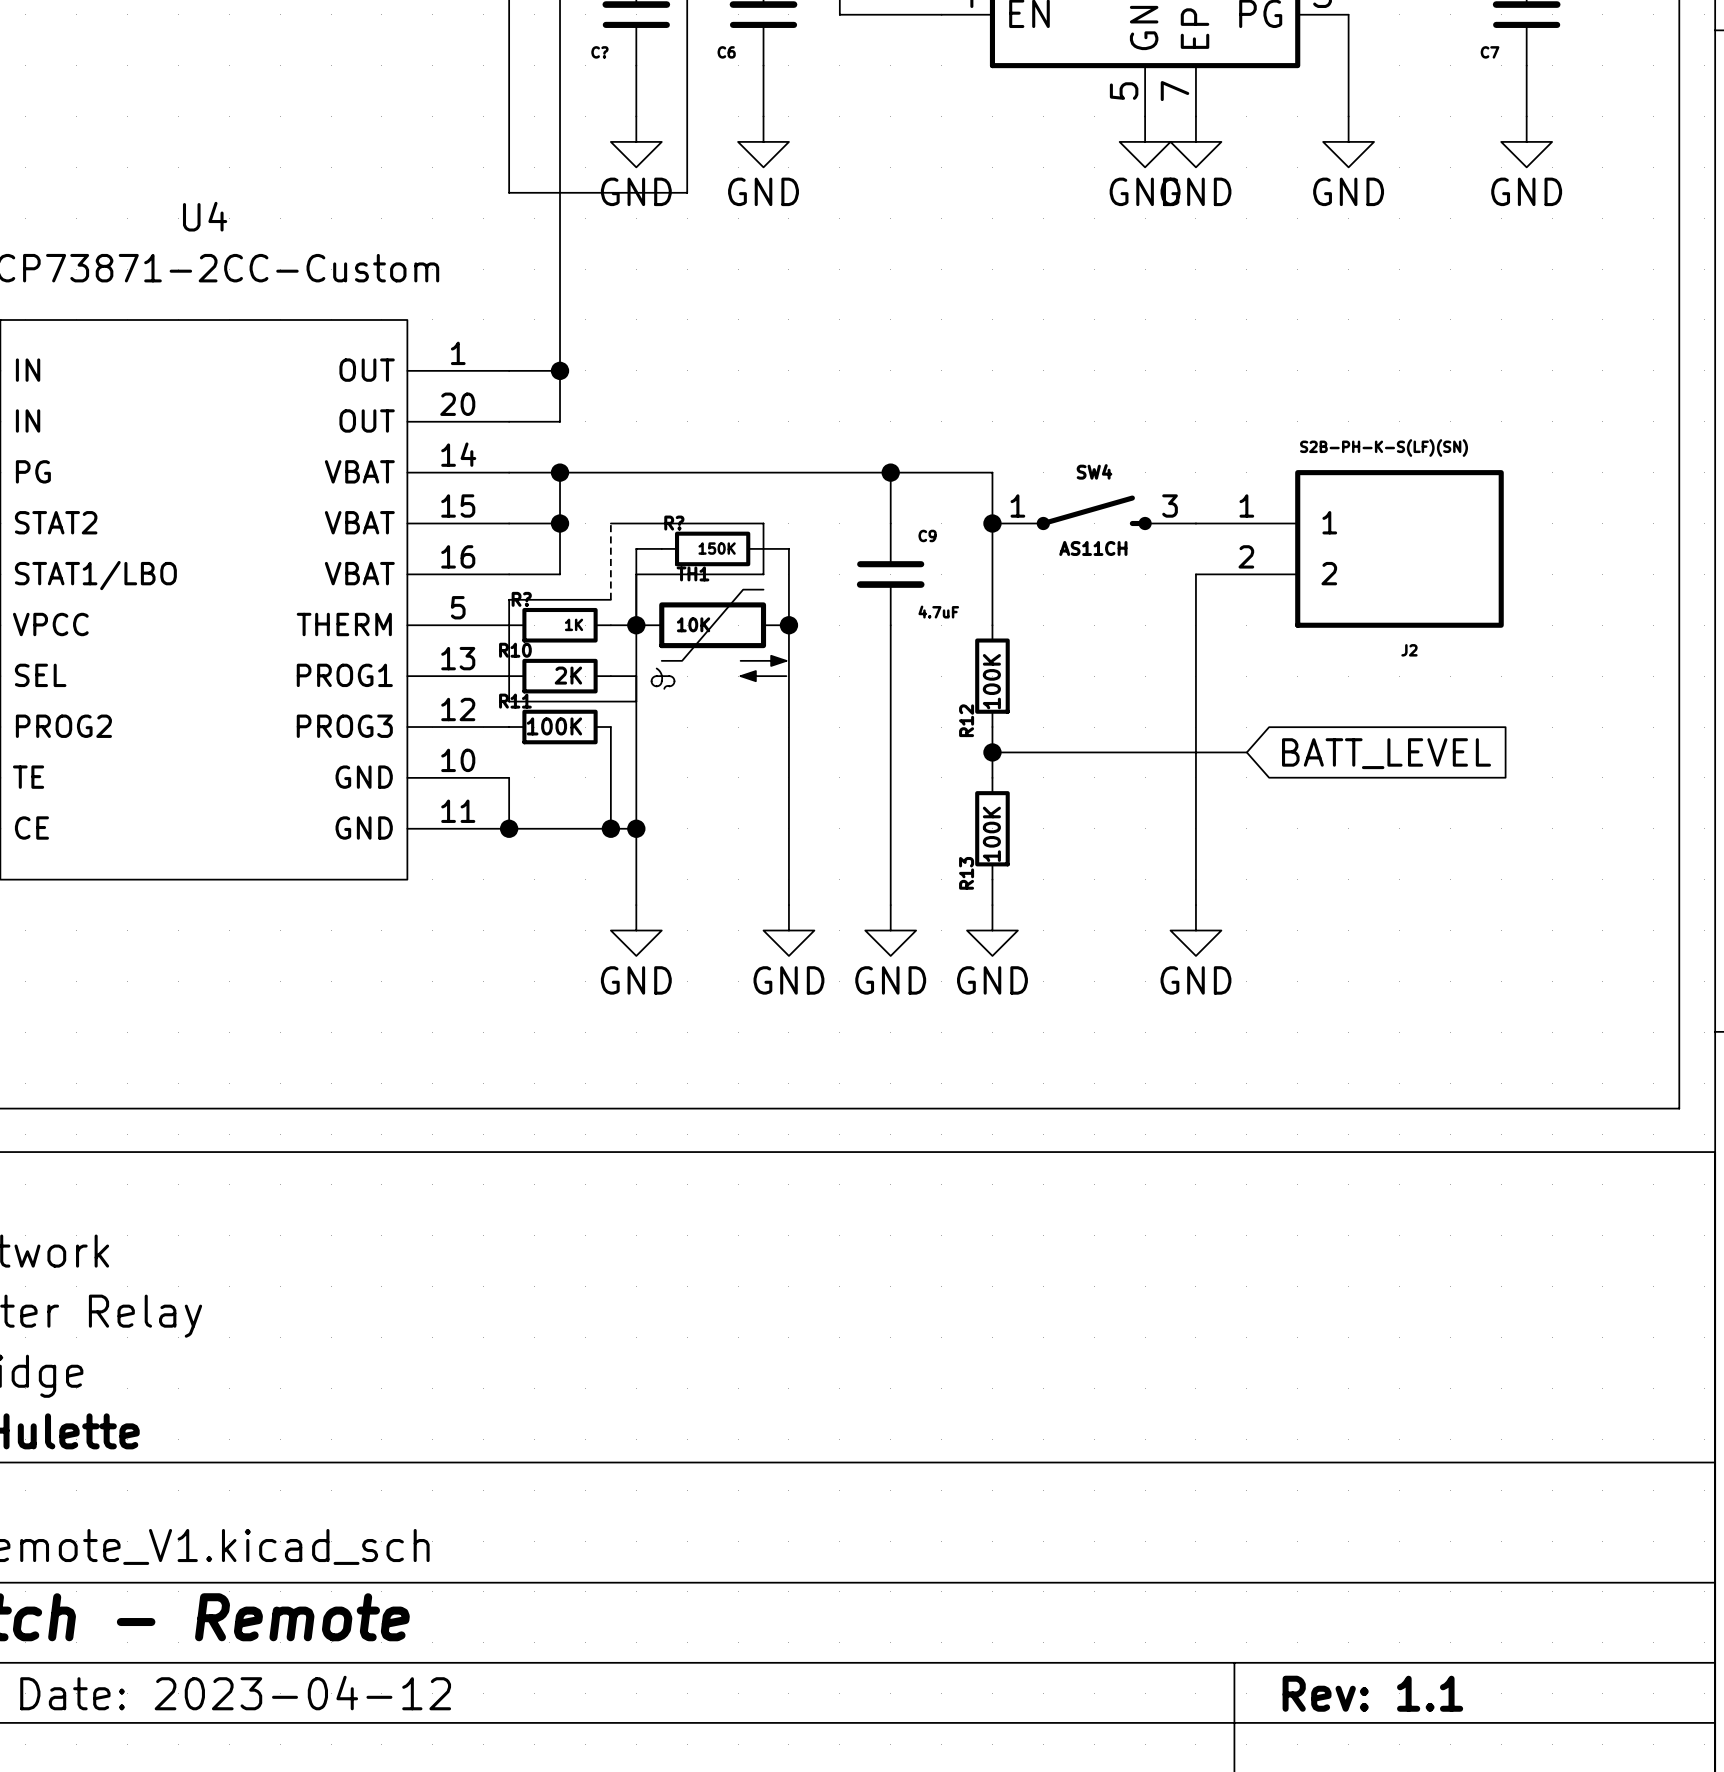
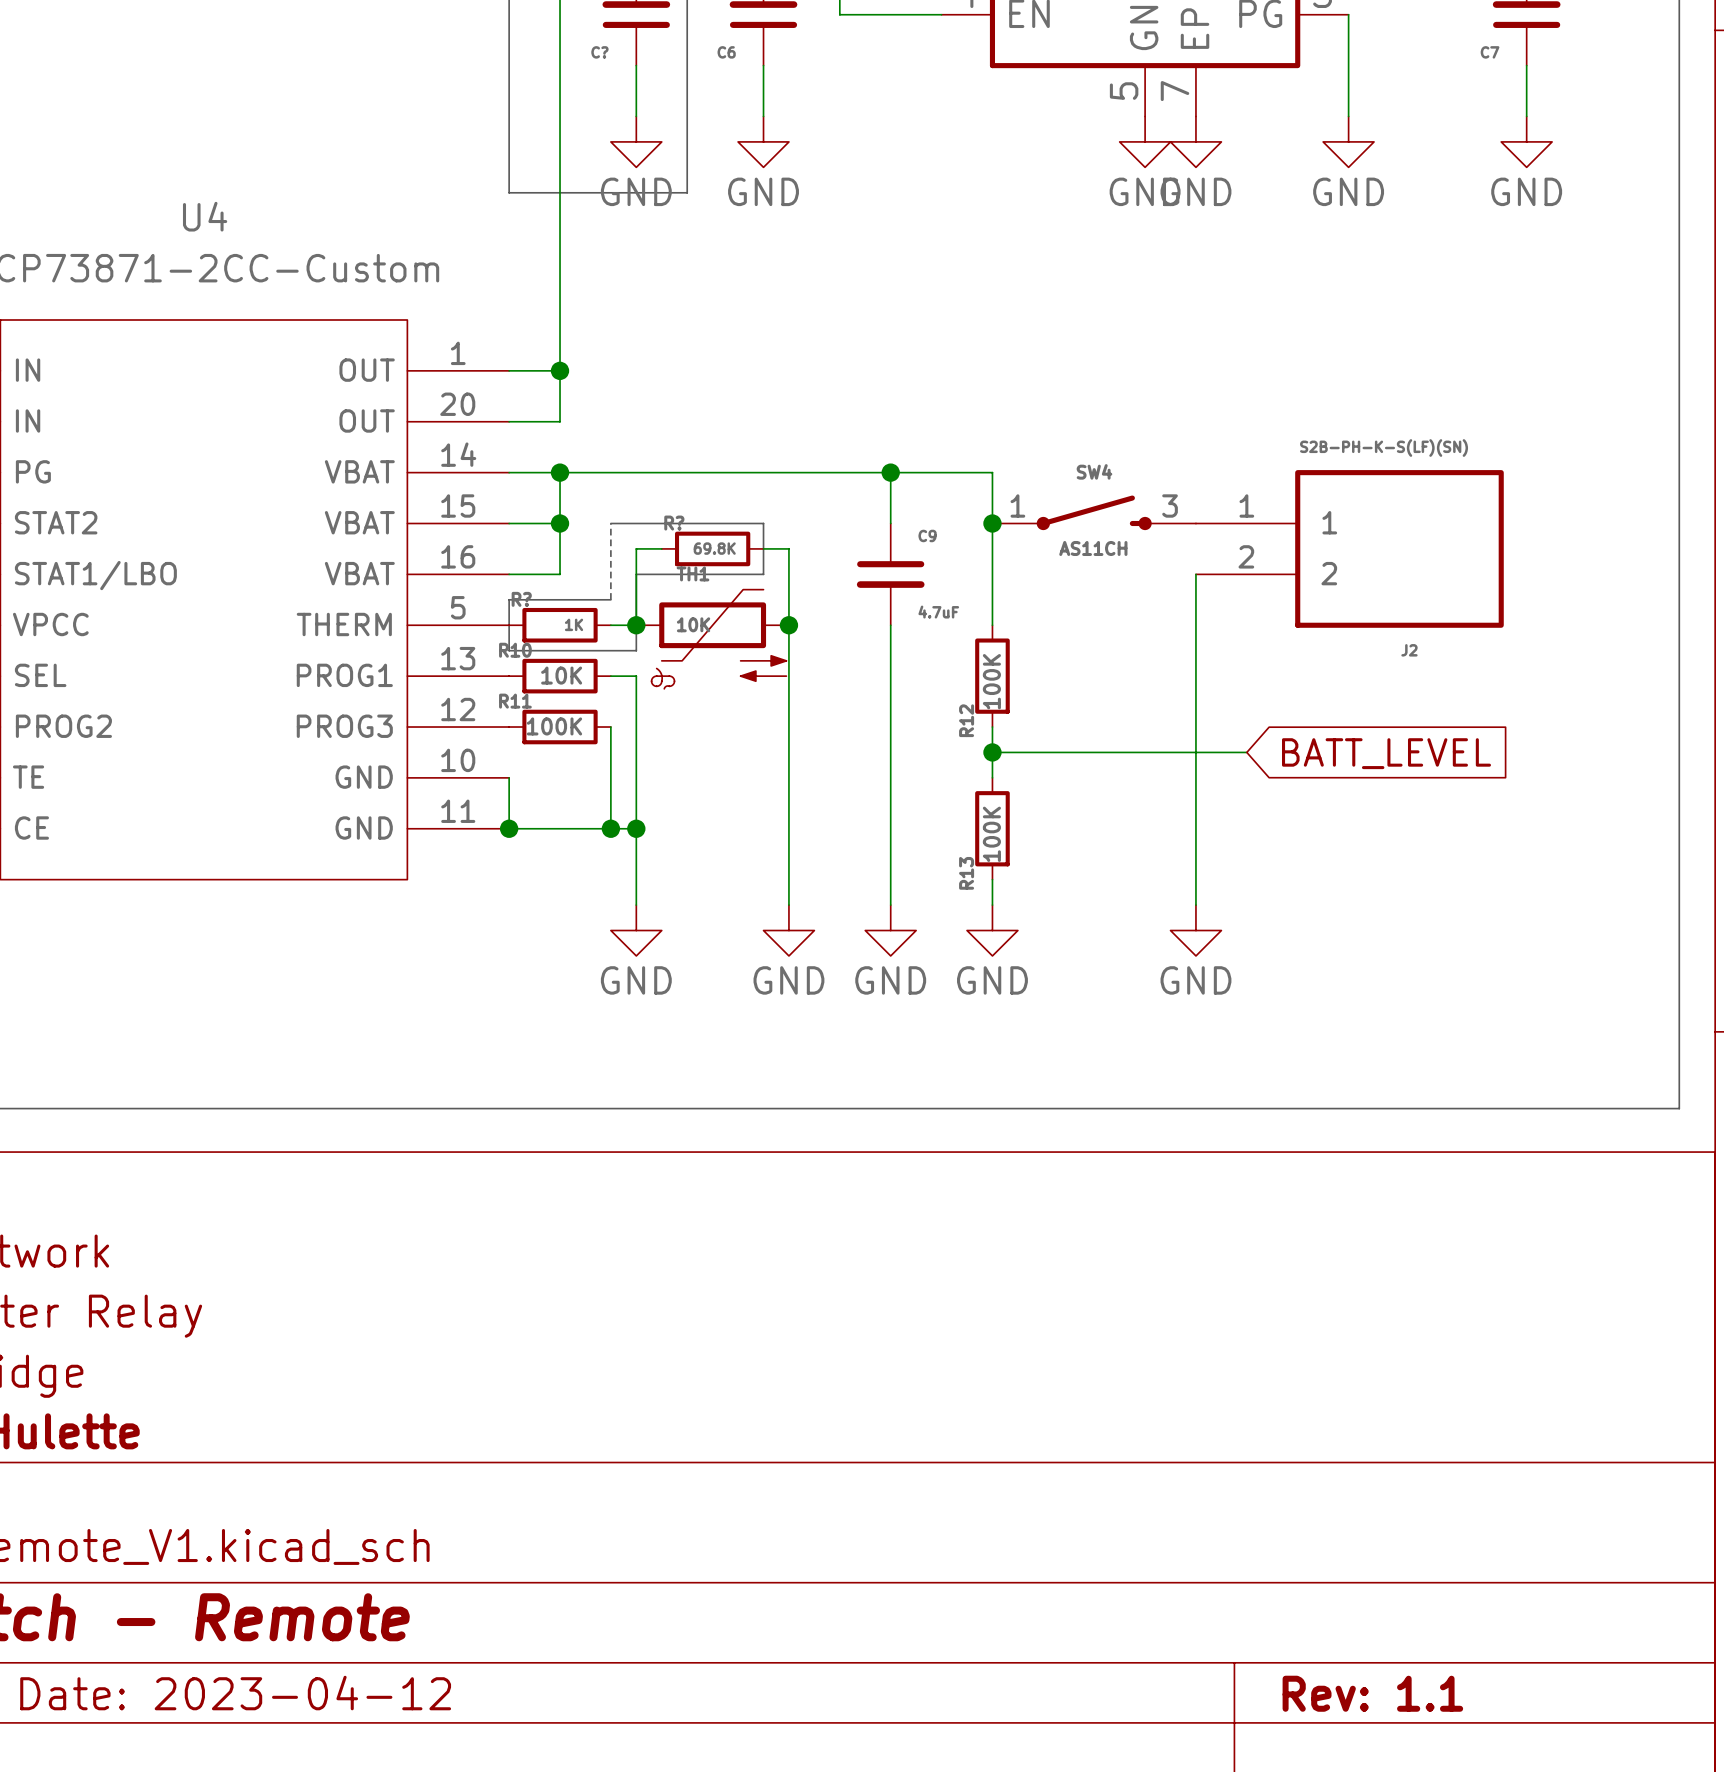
R? value: 150K (717, 548) -> 69.8K (714, 548)
line: (509, 650) (509, 701) (636, 701) (636, 650) -> (509, 650) (636, 650)
R10 value: 2K (568, 675) -> 10K (561, 675)

